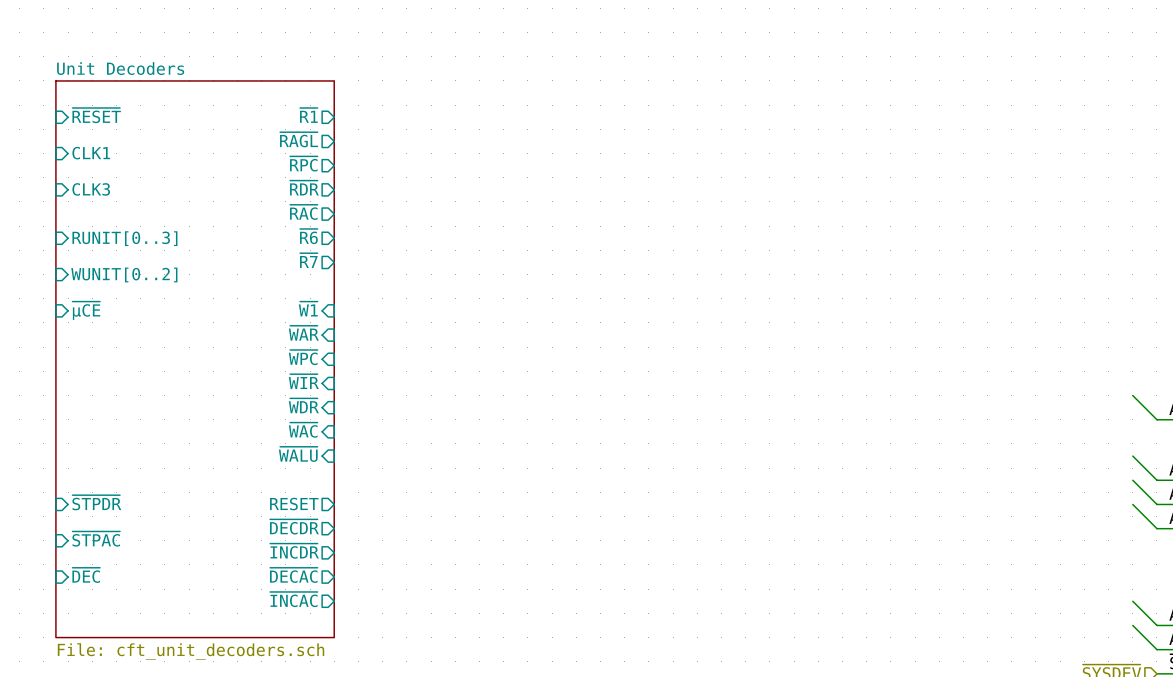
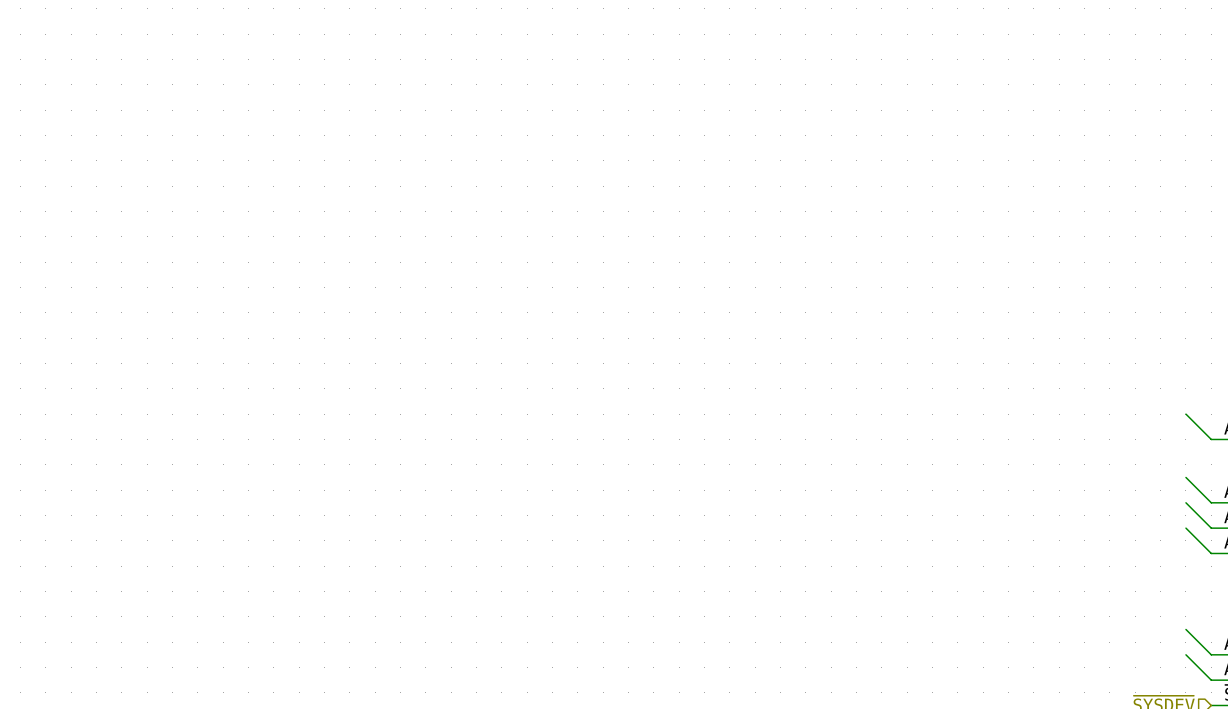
sheet pin: ~{RESET} (96, 115) -> none
sheet pin: ~{R1} (308, 115) -> none
sheet pin: ~{RAGL} (299, 139) -> none
sheet pin: CLK1 (91, 153) -> none
sheet pin: ~{RPC} (303, 163) -> none
sheet pin: ~{RDR} (304, 188) -> none
sheet pin: CLK3 (91, 189) -> none
sheet pin: ~{RAC} (303, 212) -> none
sheet pin: ~{R6} (308, 236) -> none
sheet pin: RUNIT[0..3] (124, 238) -> none
sheet pin: ~{R7} (308, 260) -> none
sheet pin: WUNIT[0..2] (124, 274) -> none
sheet pin: ~{W1} (308, 309) -> none
sheet pin: ~{µCE} (86, 310) -> none
sheet pin: ~{WAR} (303, 333) -> none
sheet pin: ~{WPC} (303, 357) -> none
sheet Unit Decoders: File: cft_unit_decoders.sch (195, 359) -> none
sheet pin: ~{WIR} (303, 381) -> none
sheet pin: ~{WDR} (303, 405) -> none
sheet pin: ~{WAC} (303, 430) -> none
sheet pin: ~{WALU} (298, 454) -> none
sheet pin: ~{STPDR} (96, 502) -> none
sheet pin: RESET (294, 504) -> none
sheet pin: ~{DECDR} (294, 526) -> none
sheet pin: ~{STPAC} (96, 539) -> none
sheet pin: ~{INCDR} (294, 551) -> none
sheet pin: ~{DEC} (86, 575) -> none
sheet pin: ~{DECAC} (293, 575) -> none
sheet pin: ~{INCAC} (293, 599) -> none

